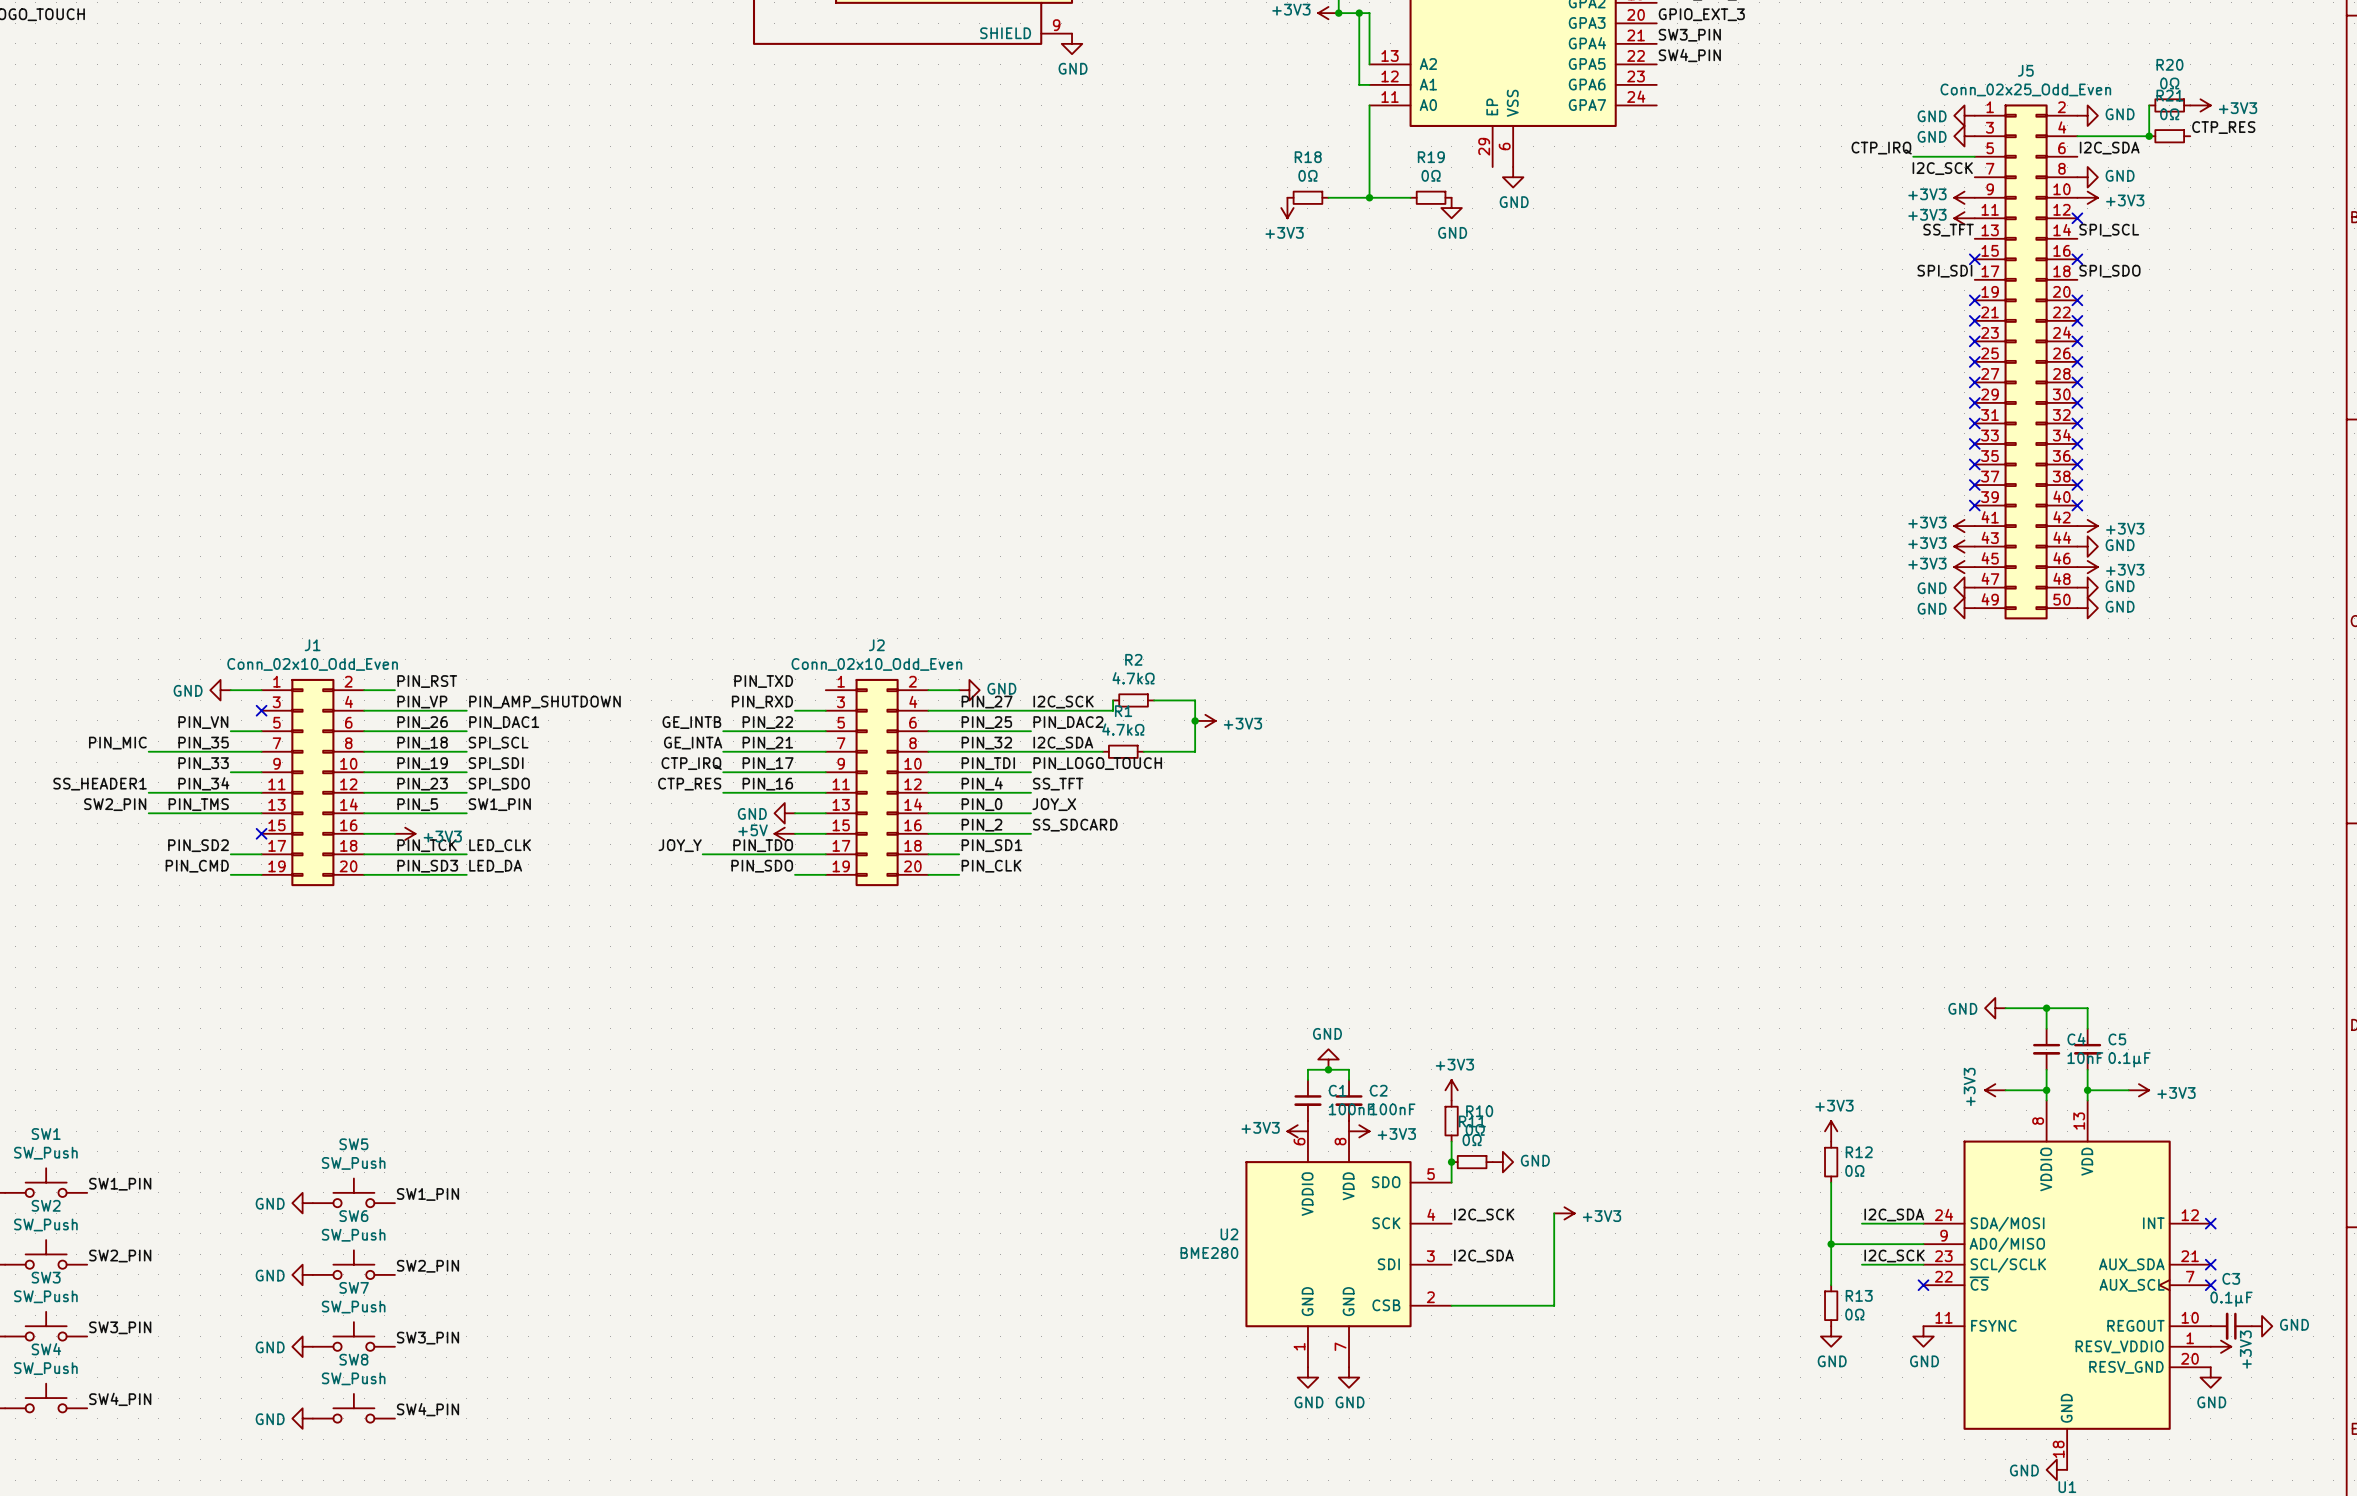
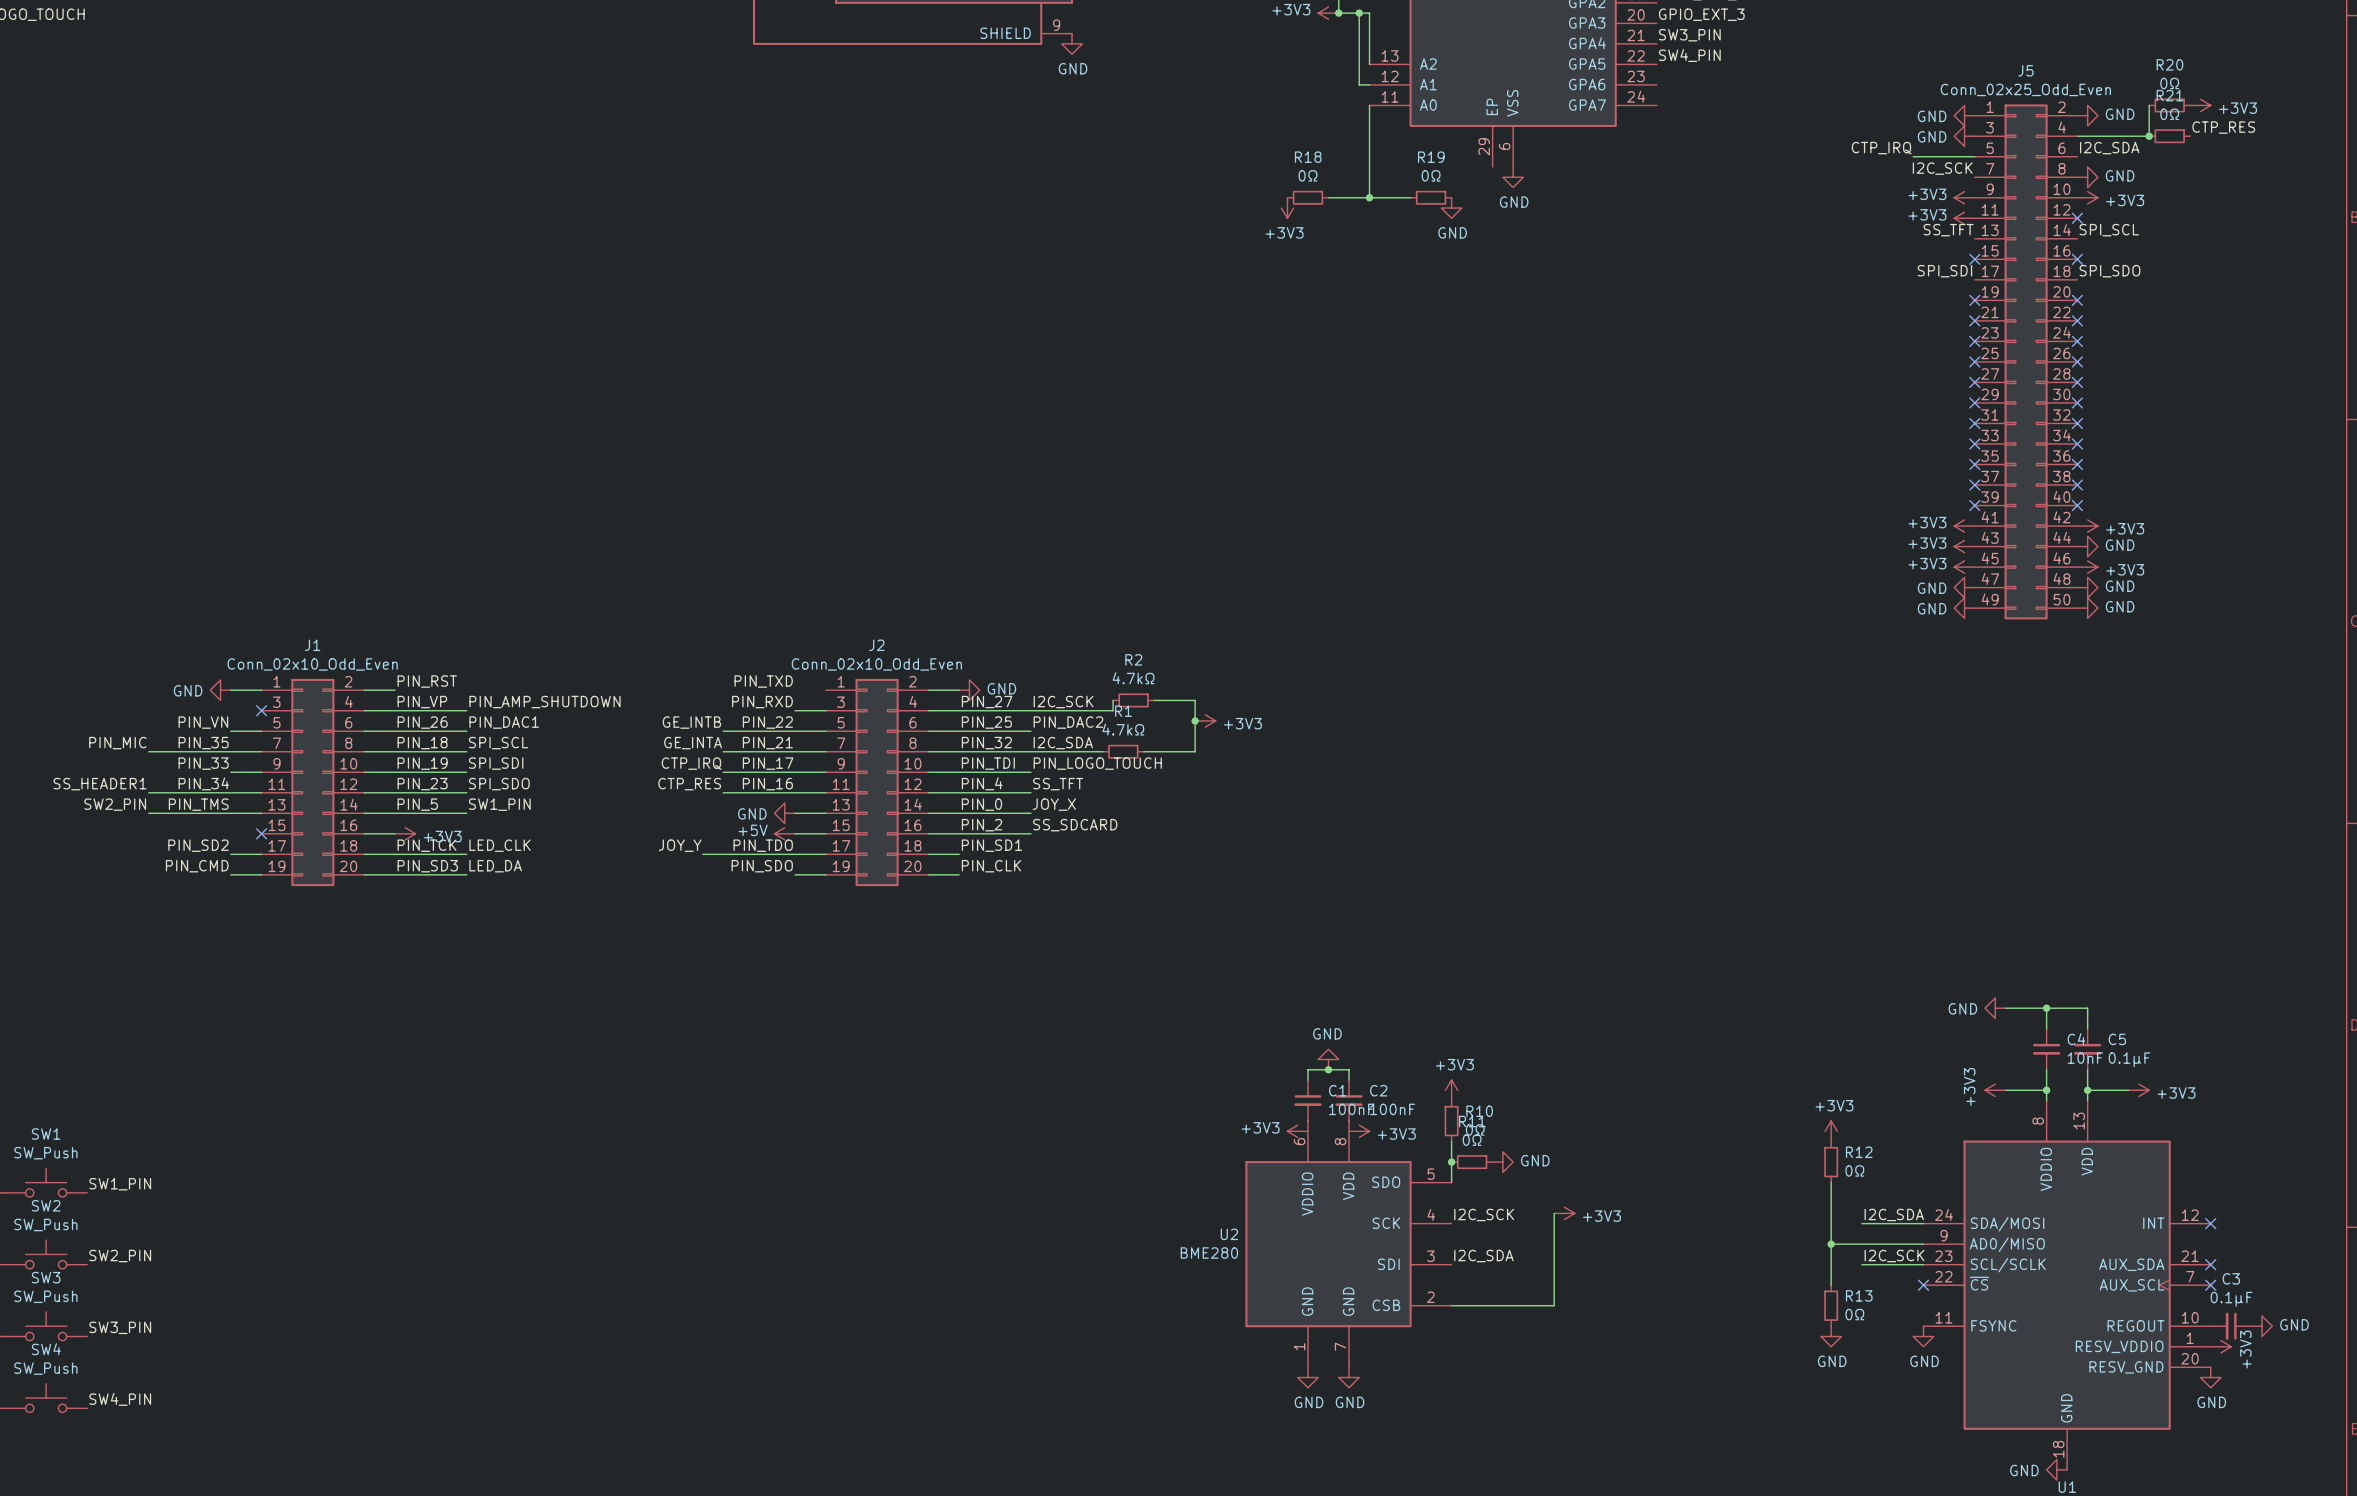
SW5: SW_Push (353, 1192) -> none
label: SW1_PIN (427, 1194) -> none
power symbol: GND (302, 1203) -> none
SW6: SW_Push (353, 1264) -> none
label: SW2_PIN (427, 1266) -> none
power symbol: GND (302, 1274) -> none
SW7: SW_Push (353, 1336) -> none
label: SW3_PIN (427, 1338) -> none
power symbol: GND (302, 1346) -> none
SW8: SW_Push (353, 1408) -> none
label: SW4_PIN (427, 1409) -> none
power symbol: GND (302, 1418) -> none

